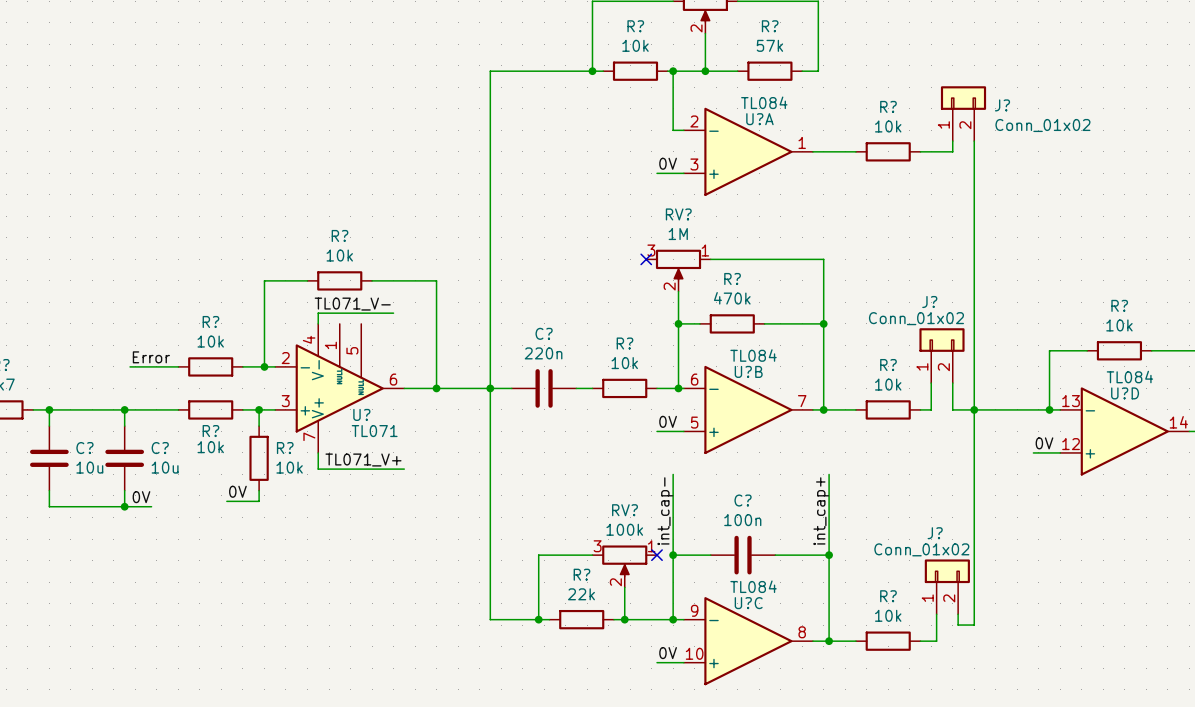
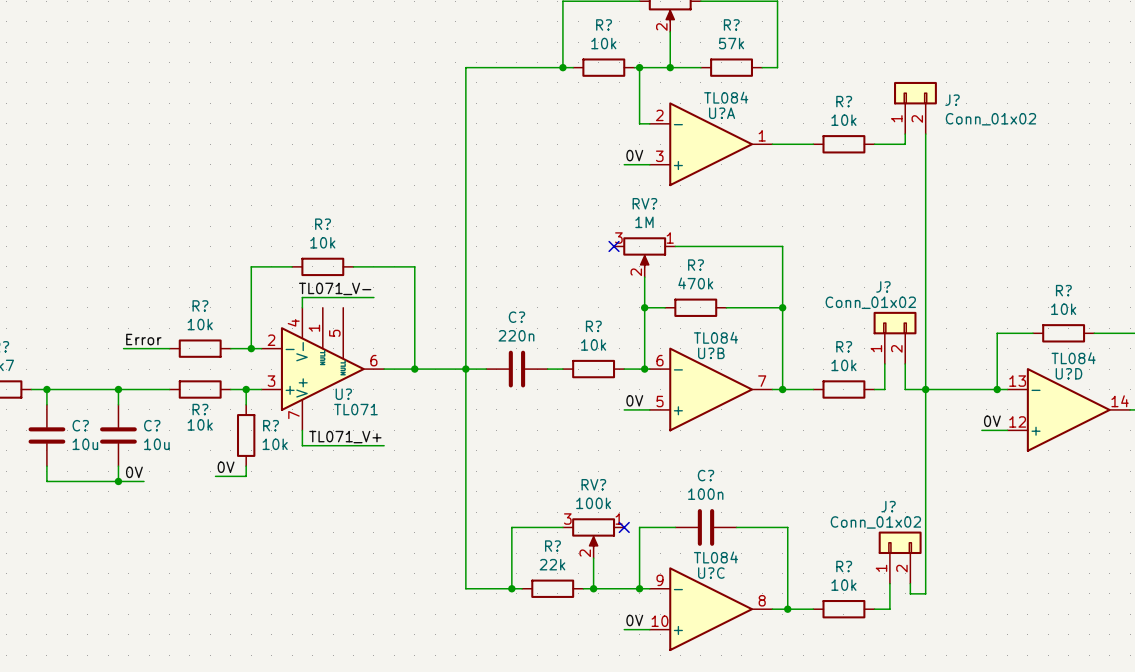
wire: (673, 474) (673, 555) -> none
wire: (829, 474) (829, 555) -> none
label: int_cap- (665, 511) -> none
label: int_cap+ (821, 511) -> none
junction: (673, 555) -> none
junction: (829, 555) -> none

